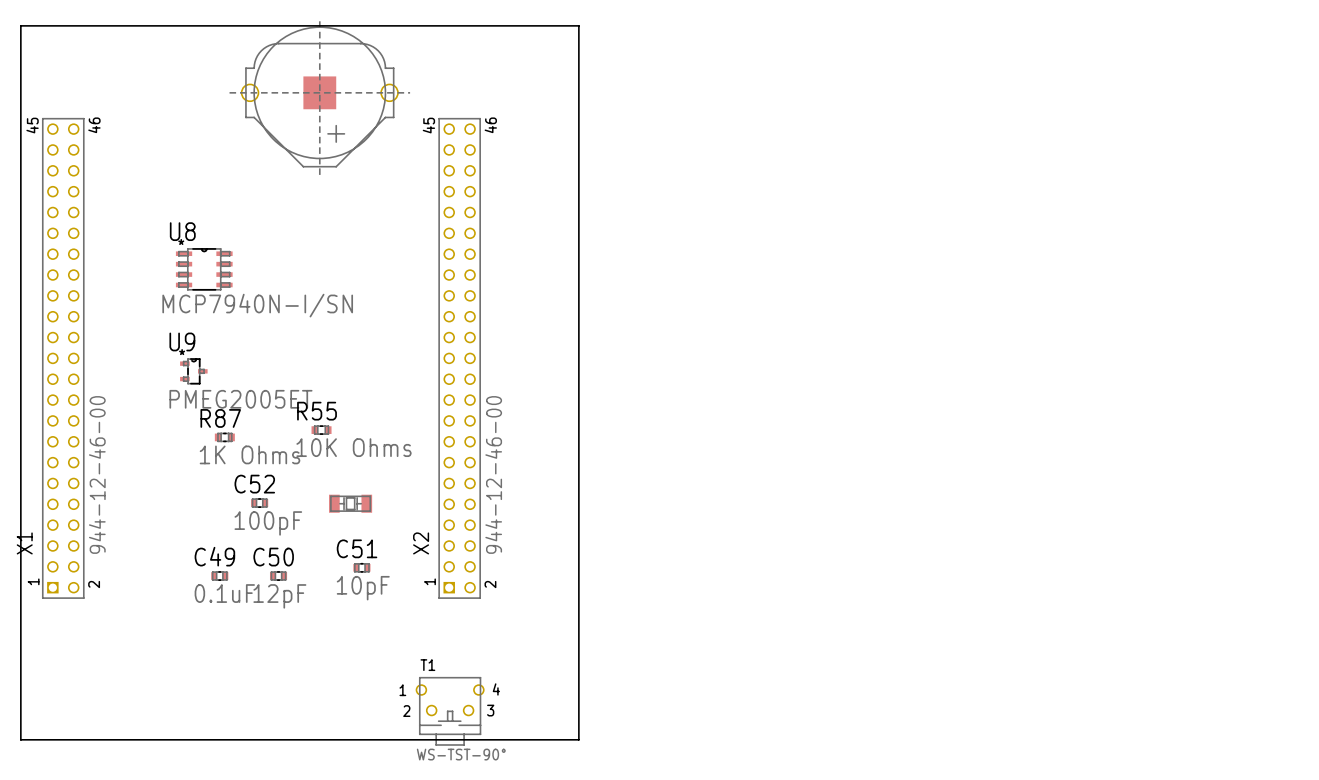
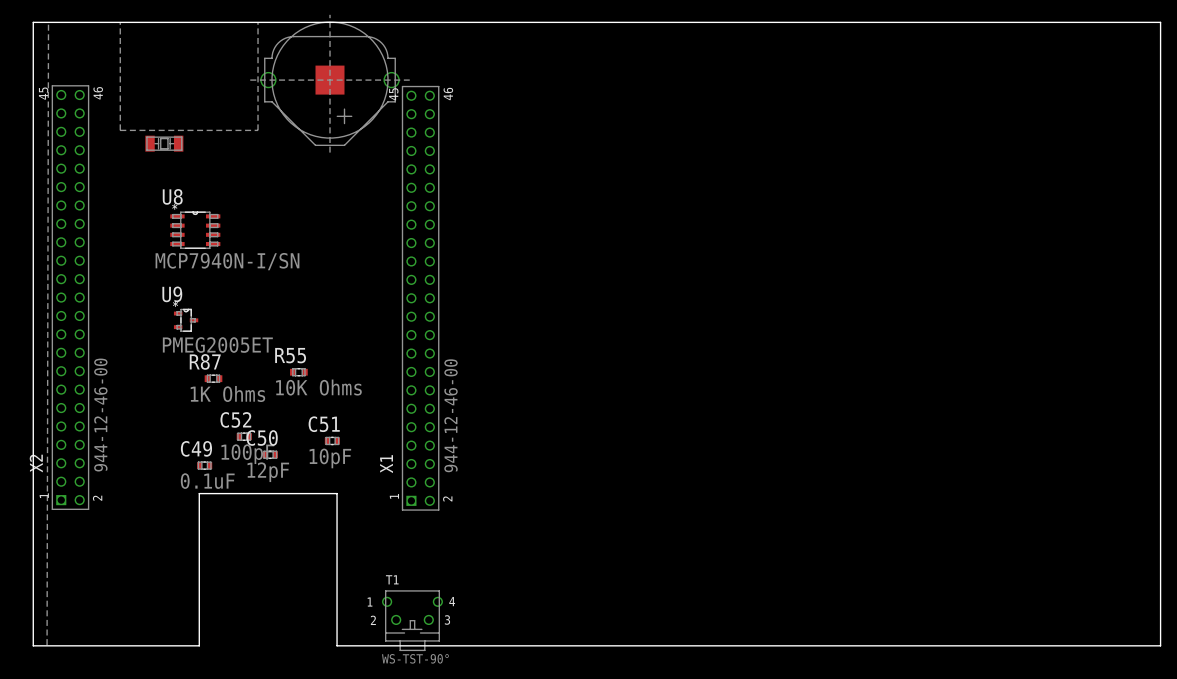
board edge: (20, 34) (20, 25) (578, 25) (578, 739) -> (33, 22) (1160, 22) (1160, 645) (526, 645)
line: none -> (48, 22) (47, 645)
line: none -> (120, 22) (120, 130) (258, 130) (258, 22)
part position: (319, 96) -> (330, 83)
part: none -> (164, 143)
X1 position: (63, 358) -> (420, 298)
X2 position: (459, 358) -> (70, 297)
part: (350, 503) -> none
C51 position: (361, 567) -> (332, 440)
C49 position: (219, 576) -> (204, 465)
C50 position: (278, 576) -> (270, 454)
board edge: (208, 739) (364, 739) -> (199, 645) (199, 493) (337, 493) (337, 645)

